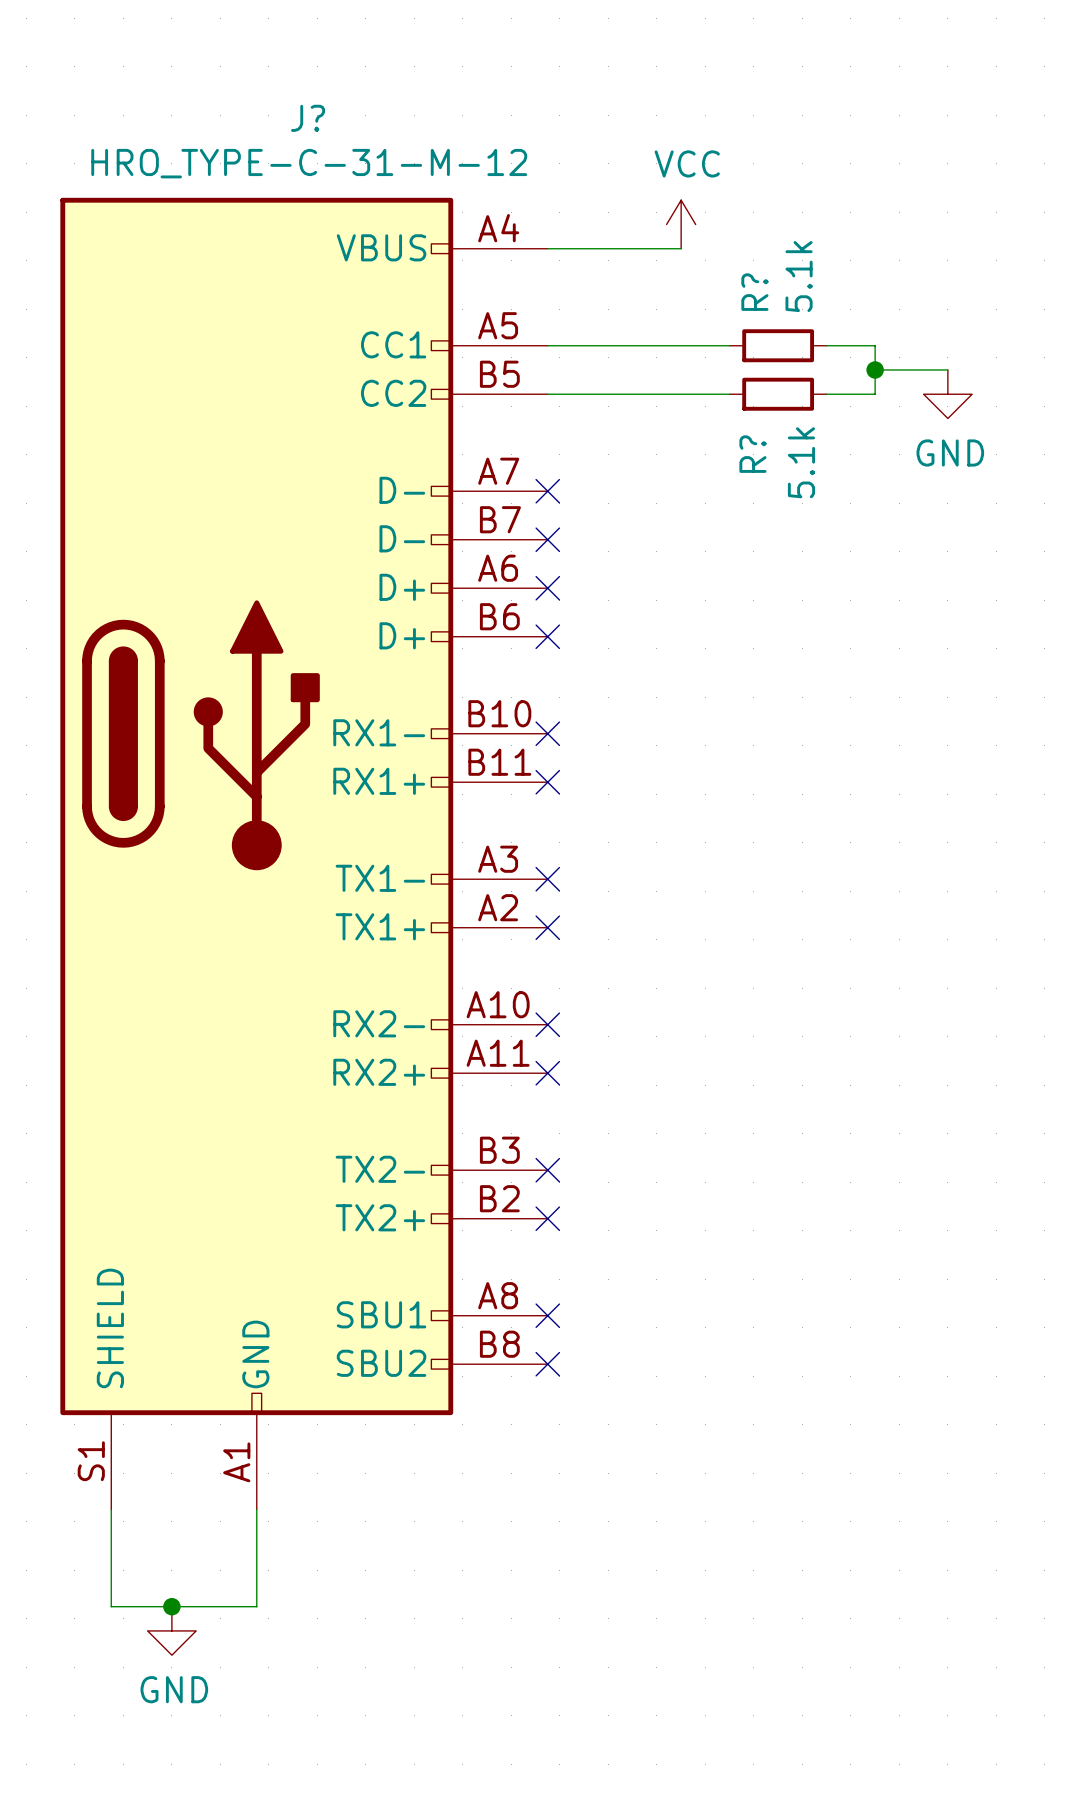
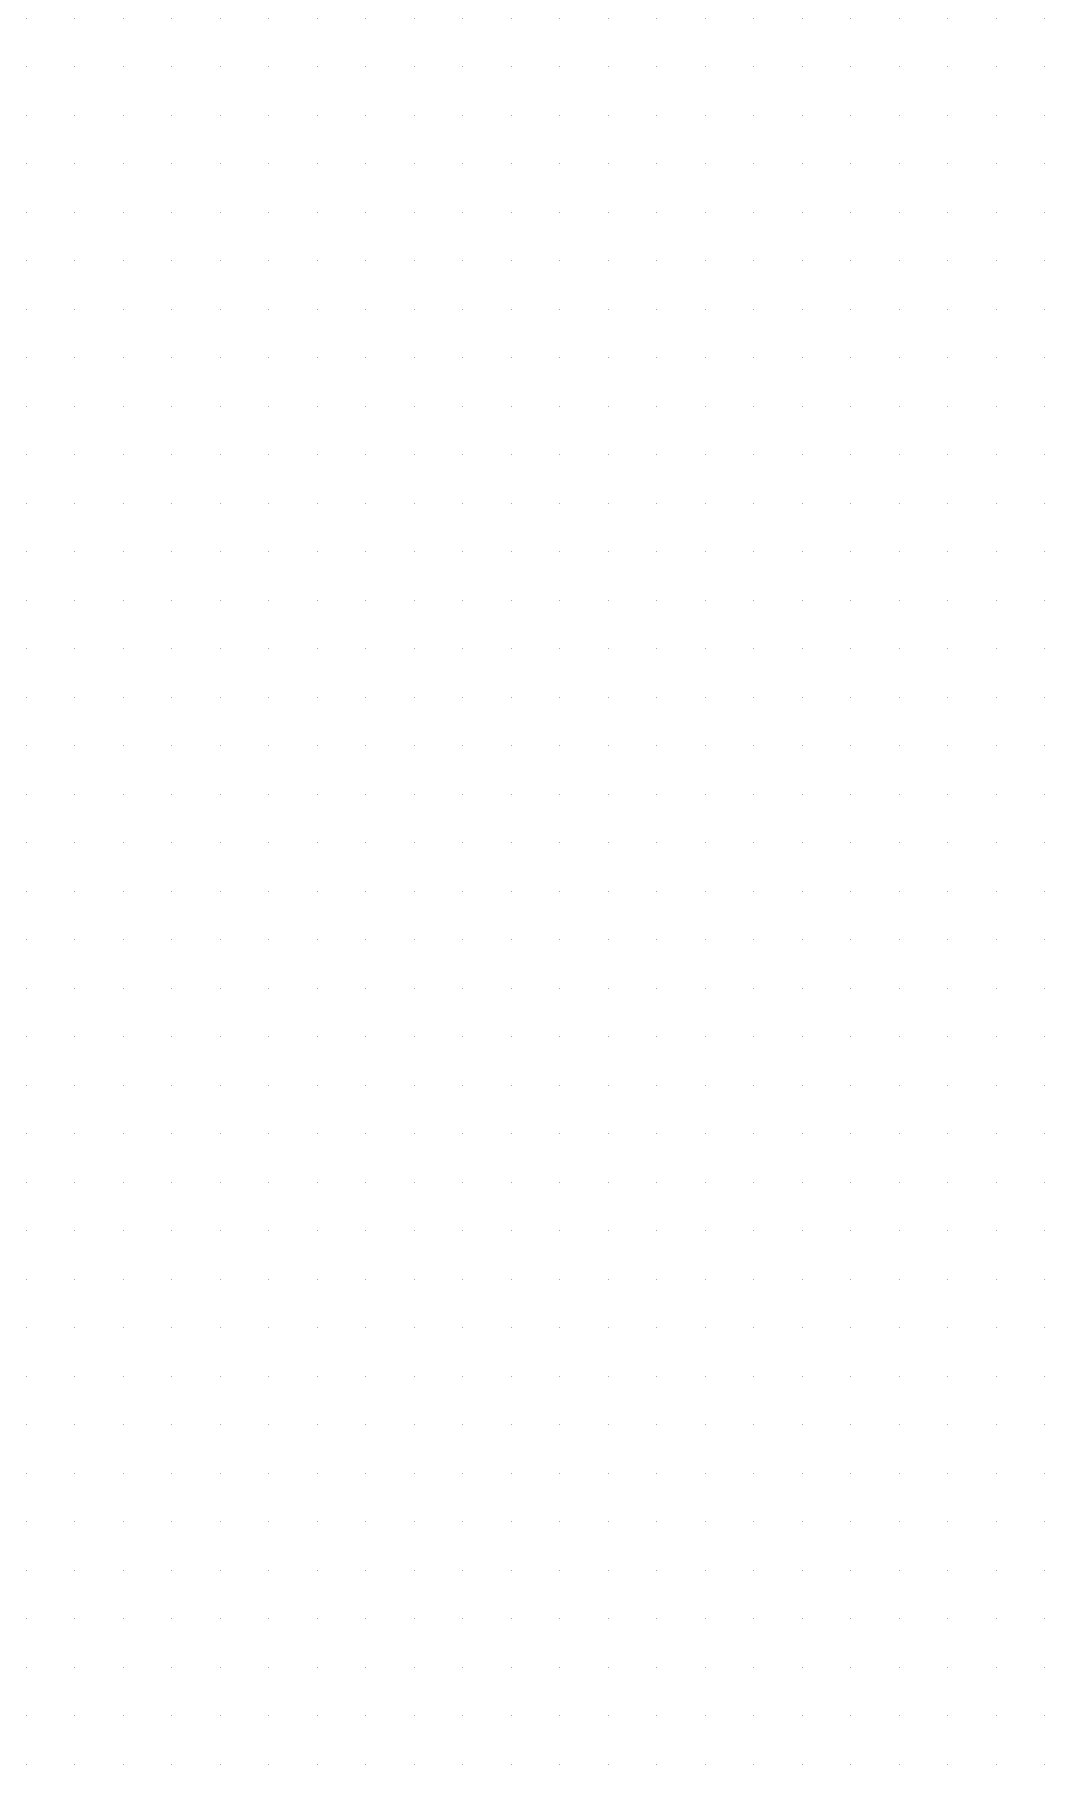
power symbol: VCC (681, 224) -> none
wire: (547, 248) (681, 248) -> none
wire: (547, 345) (729, 345) -> none
R?: 5.1k (778, 345) -> none
wire: (826, 345) (875, 345) (875, 394) (826, 394) -> none
wire: (875, 369) (947, 369) -> none
junction: (875, 369) -> none
wire: (547, 394) (729, 394) -> none
R?: 5.1k (778, 394) -> none
power symbol: GND (947, 394) -> none
no-connect mark: (547, 491) -> none
no-connect mark: (547, 539) -> none
no-connect mark: (547, 588) -> none
no-connect mark: (547, 636) -> none
no-connect mark: (547, 733) -> none
no-connect mark: (547, 782) -> none
J?: HRO_TYPE-C-31-M-12 (304, 853) -> none
no-connect mark: (547, 879) -> none
no-connect mark: (547, 927) -> none
no-connect mark: (547, 1024) -> none
no-connect mark: (547, 1073) -> none
no-connect mark: (547, 1170) -> none
no-connect mark: (547, 1218) -> none
no-connect mark: (547, 1315) -> none
no-connect mark: (547, 1364) -> none
wire: (111, 1509) (111, 1606) (256, 1606) (256, 1509) -> none
junction: (171, 1606) -> none
power symbol: GND (171, 1630) -> none

